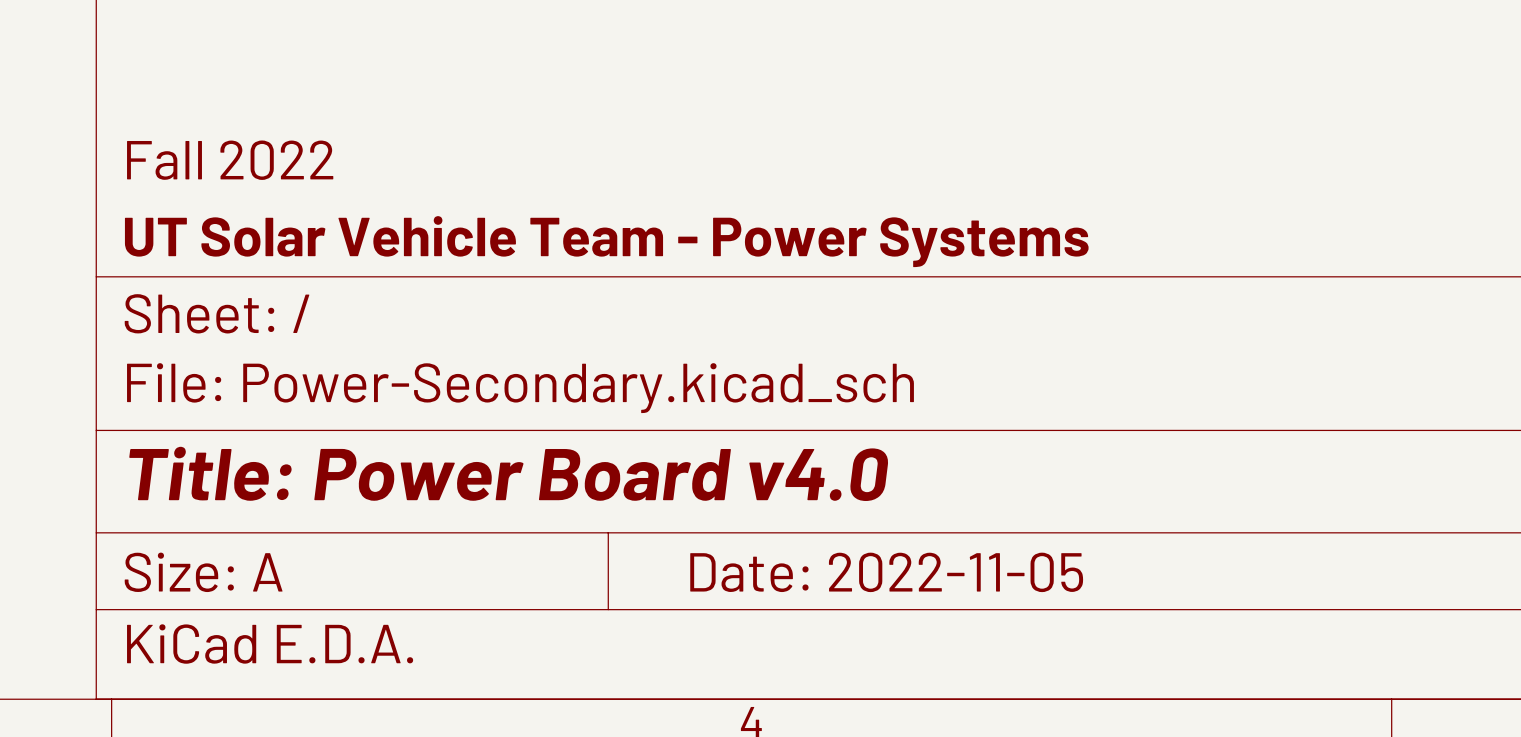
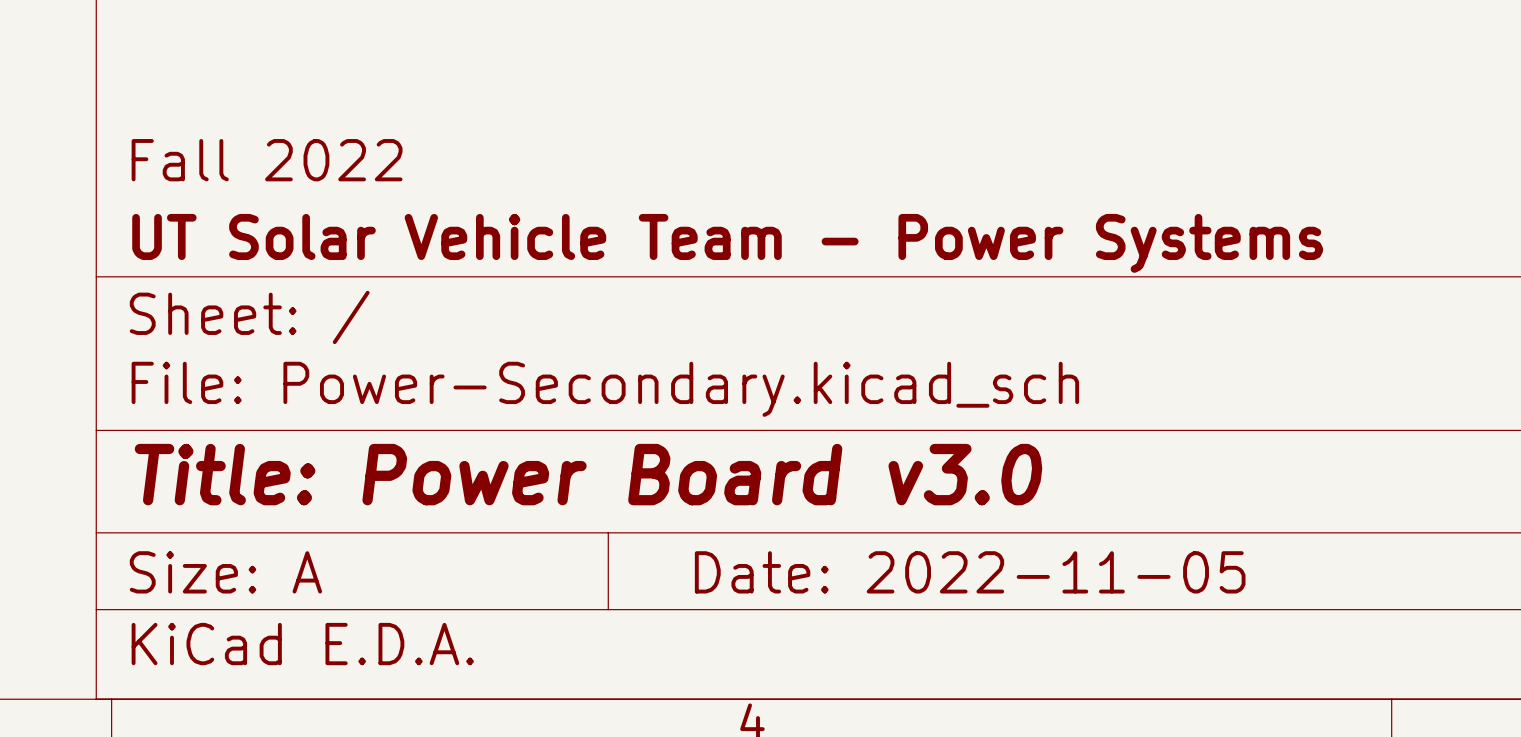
title block: Title: Power Board v4.0 (509, 473) -> Title: Power Board v3.0 (588, 474)

